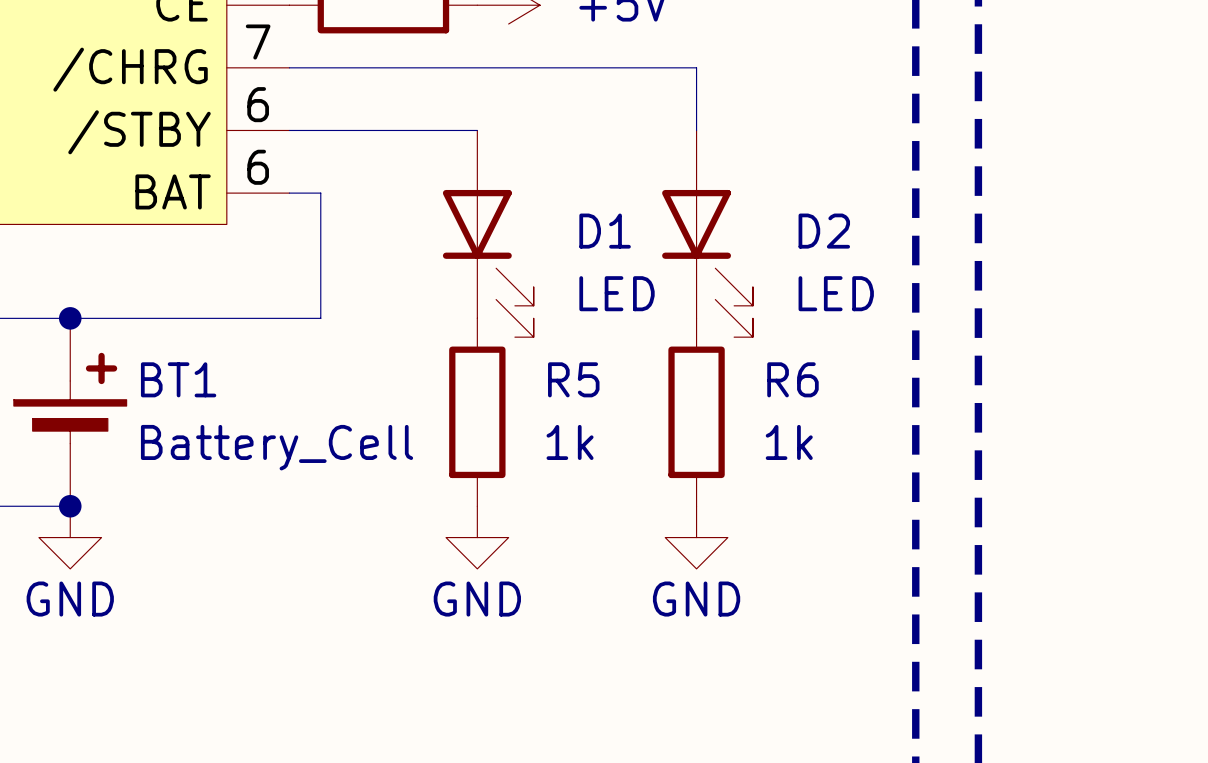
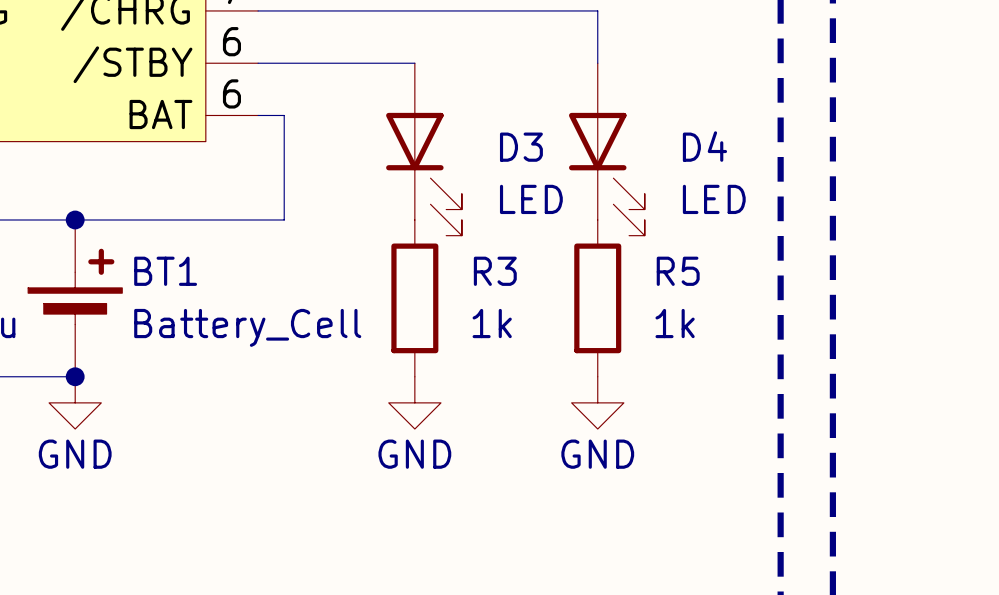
D1 name: D1 (605, 231) -> D3 (521, 147)
D2 name: D2 (824, 231) -> D4 (704, 146)
R5 name: R5 (573, 379) -> R3 (495, 271)
R6 name: R6 (792, 379) -> R5 (678, 271)

